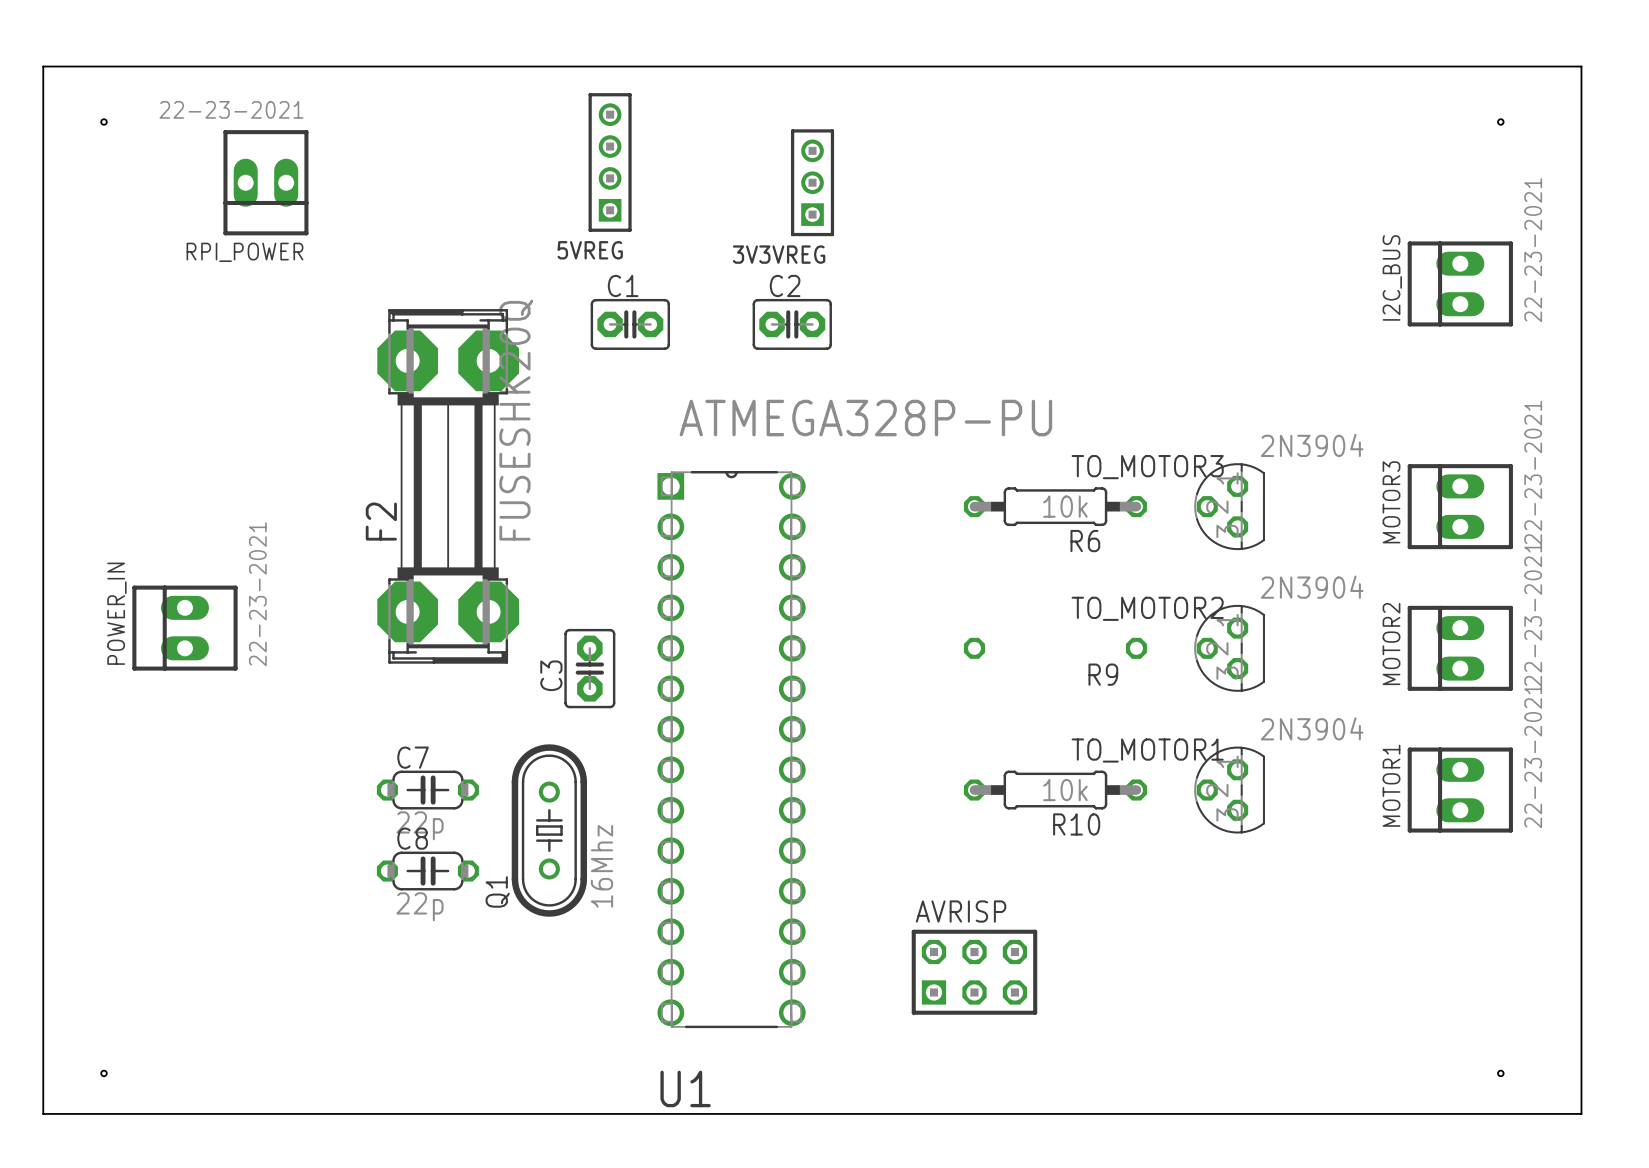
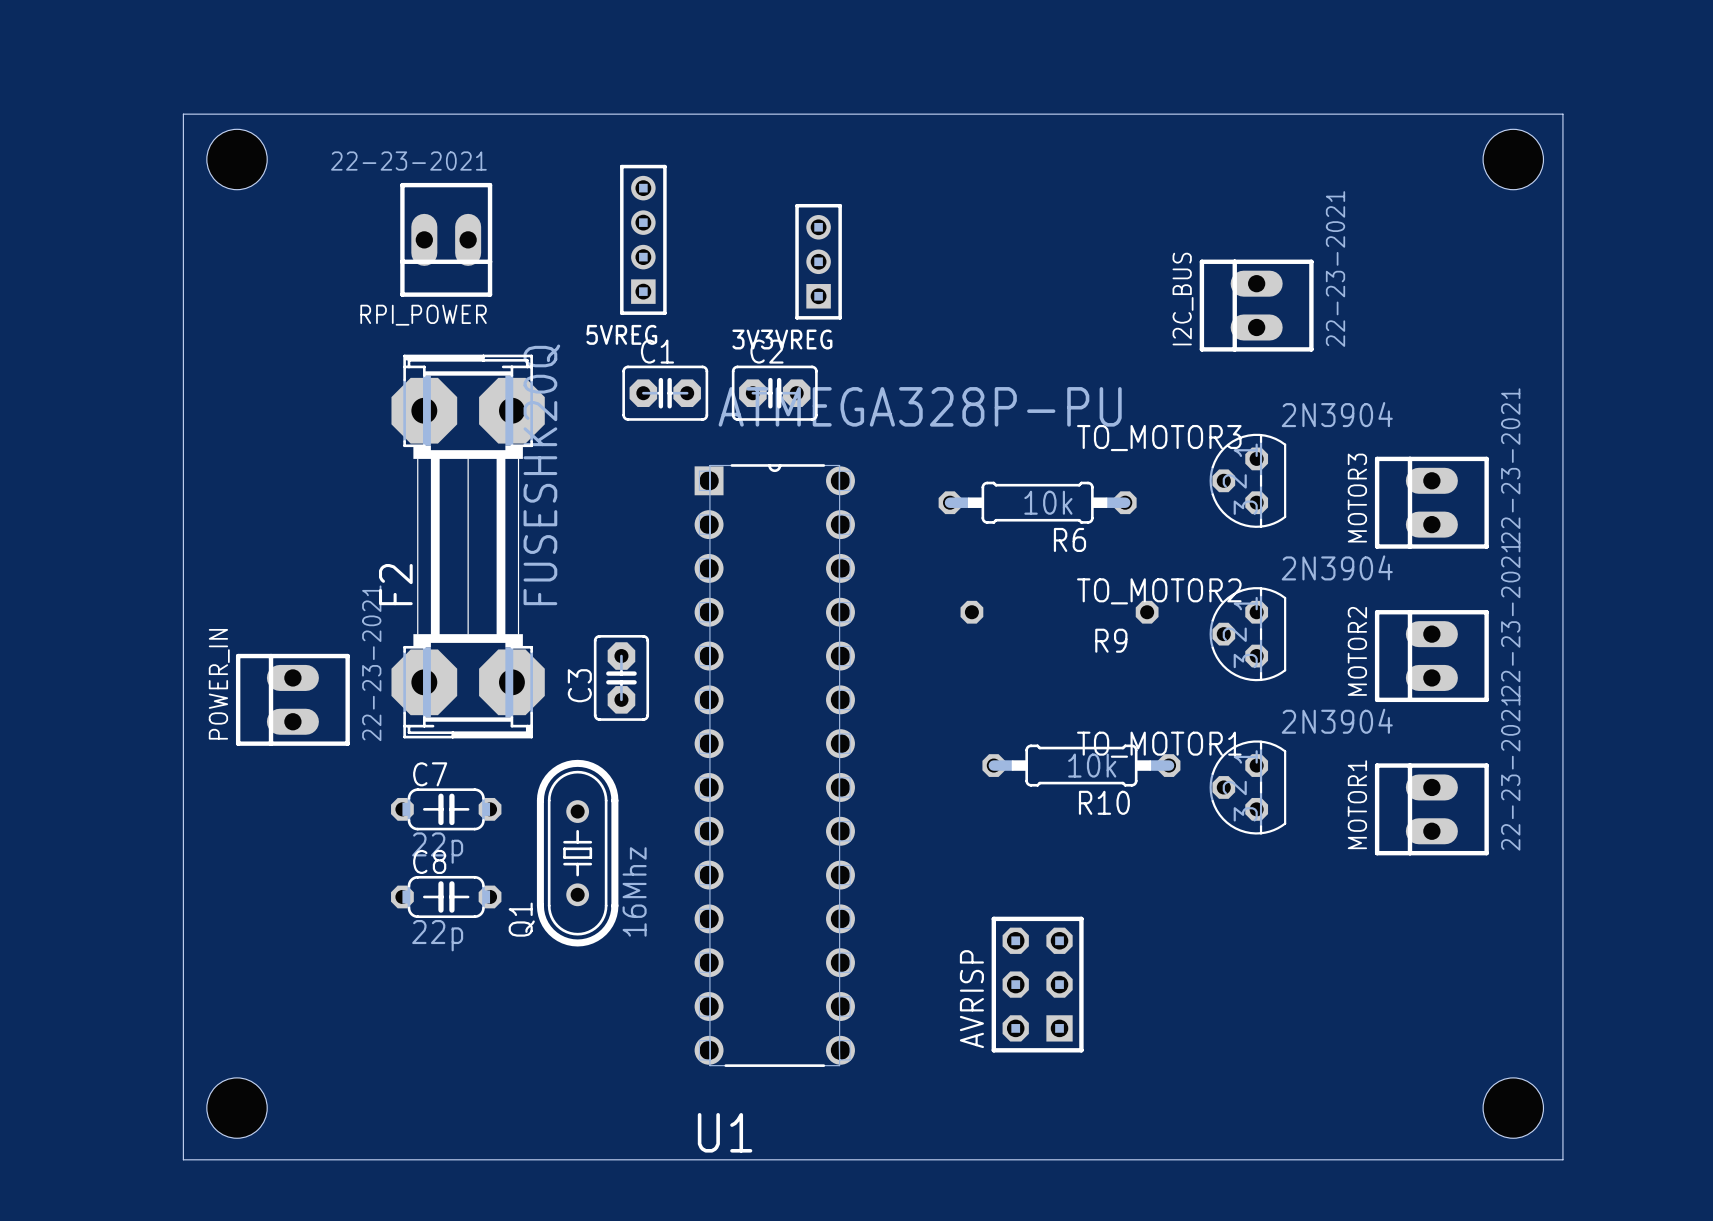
hole: (104, 122) -> none
hole: (1500, 122) -> none
5VREG position: (610, 162) -> (643, 239)
RPI_POWER position: (265, 182) -> (446, 239)
3V3VREG position: (812, 182) -> (818, 261)
hole: none -> (237, 159)
hole: none -> (1513, 159)
I2C_BUS position: (1460, 283) -> (1256, 305)
C1 position: (630, 324) -> (665, 393)
C2 position: (792, 324) -> (774, 393)
F2 position: (448, 486) -> (468, 546)
R6 position: (1055, 506) -> (1037, 502)
TO_MOTOR3 position: (1229, 506) -> (1247, 480)
MOTOR3 position: (1460, 506) -> (1431, 502)
POWER_IN position: (184, 628) -> (292, 699)
R9 position: (1055, 648) -> (1059, 612)
TO_MOTOR2 position: (1229, 648) -> (1247, 634)
MOTOR2 position: (1460, 648) -> (1431, 656)
R10 position: (1055, 790) -> (1081, 765)
TO_MOTOR1 position: (1229, 790) -> (1247, 787)
MOTOR1 position: (1460, 790) -> (1431, 809)
AVRISP rotation: 0° (974, 972) -> 90° counterclockwise (1037, 984)
hole: none -> (237, 1108)
hole: none -> (1513, 1108)
hole: (104, 1073) -> none
hole: (1500, 1073) -> none
board edge: (184, 1113) (43, 1113) (43, 66) (1581, 66) (1581, 1113) (1460, 1113) -> (183, 1159) (183, 114) (1562, 114) (1562, 1159)

